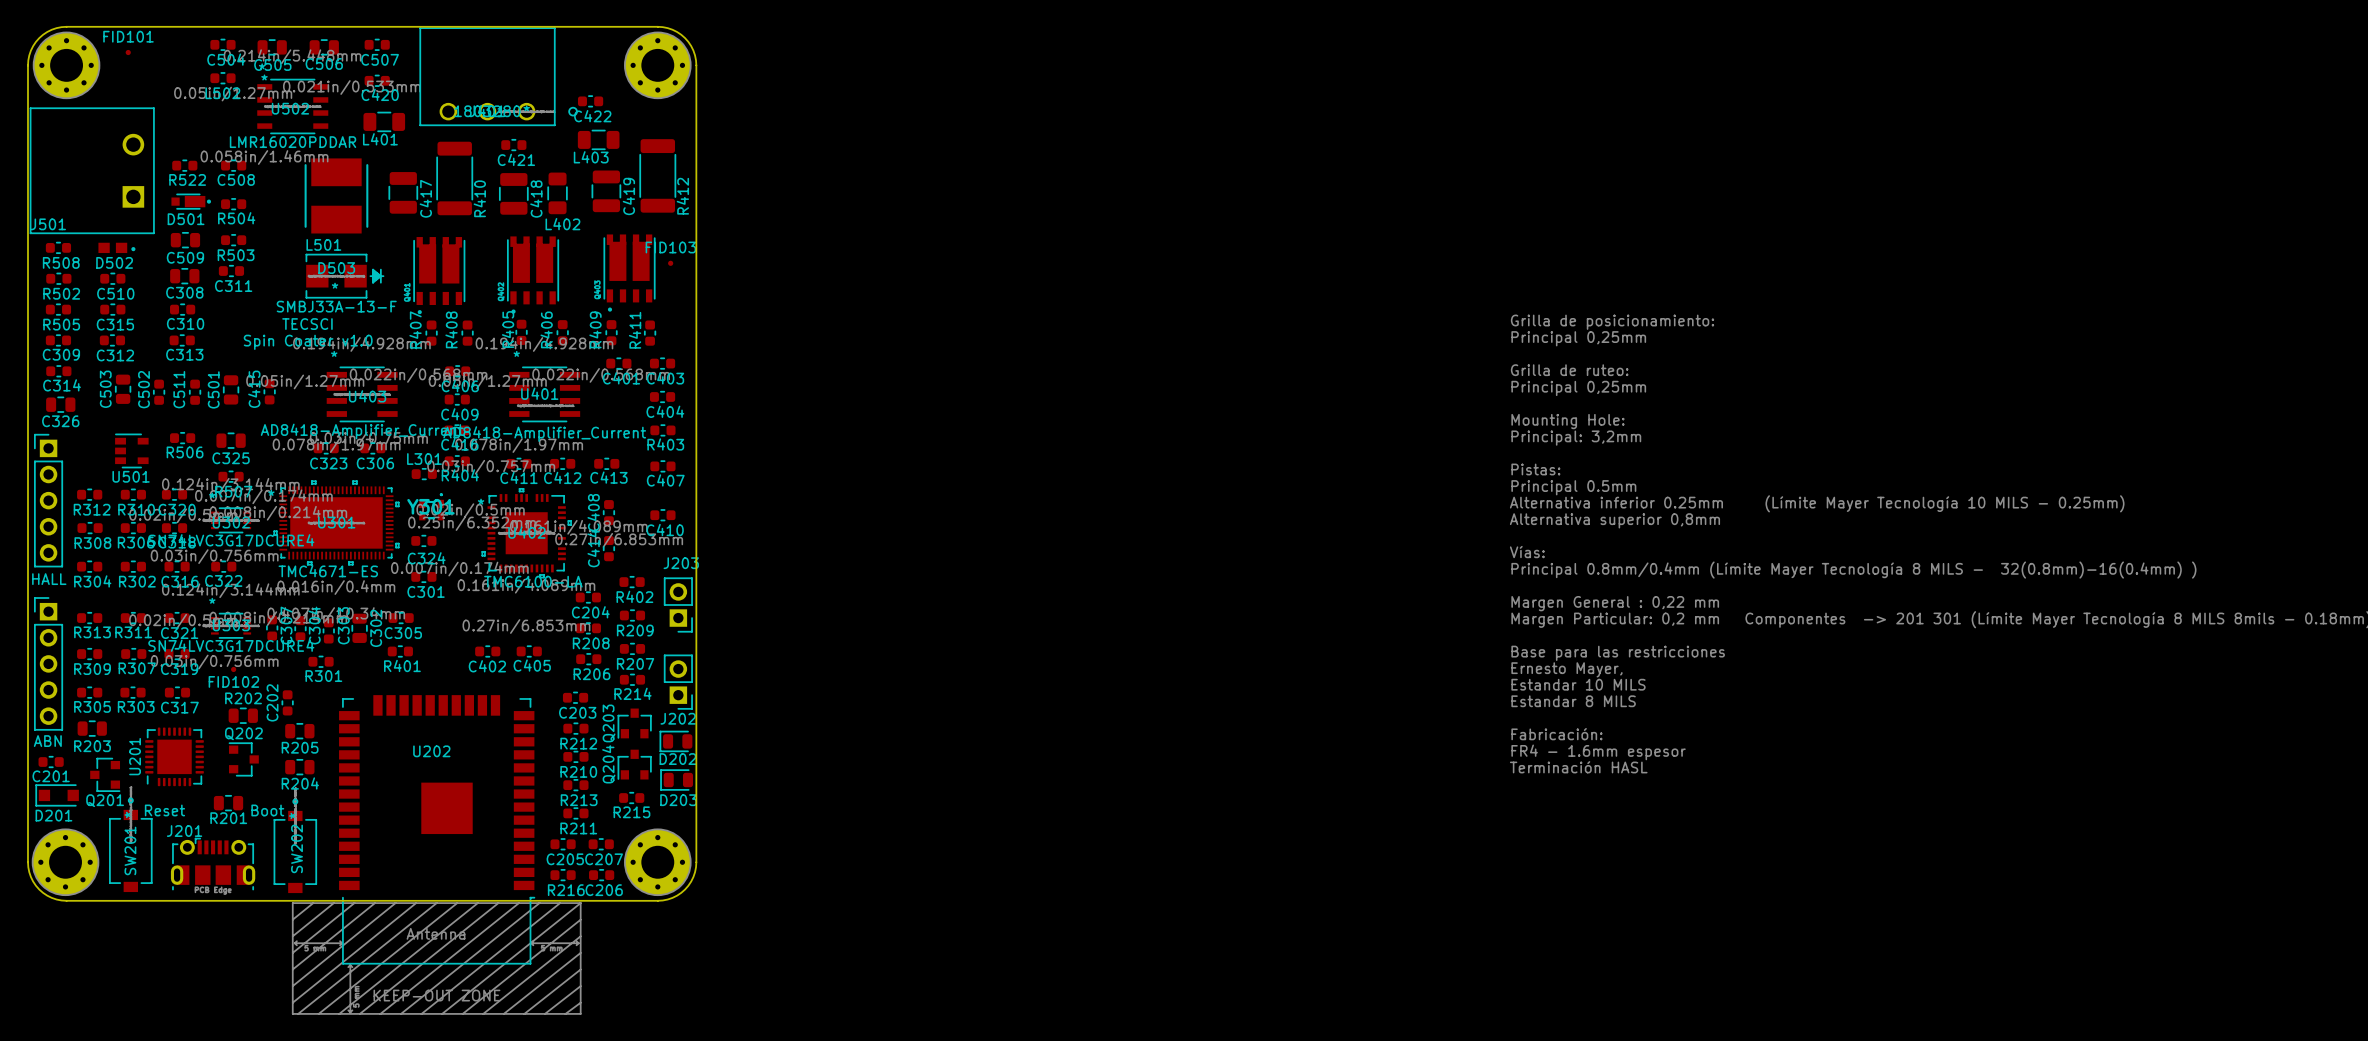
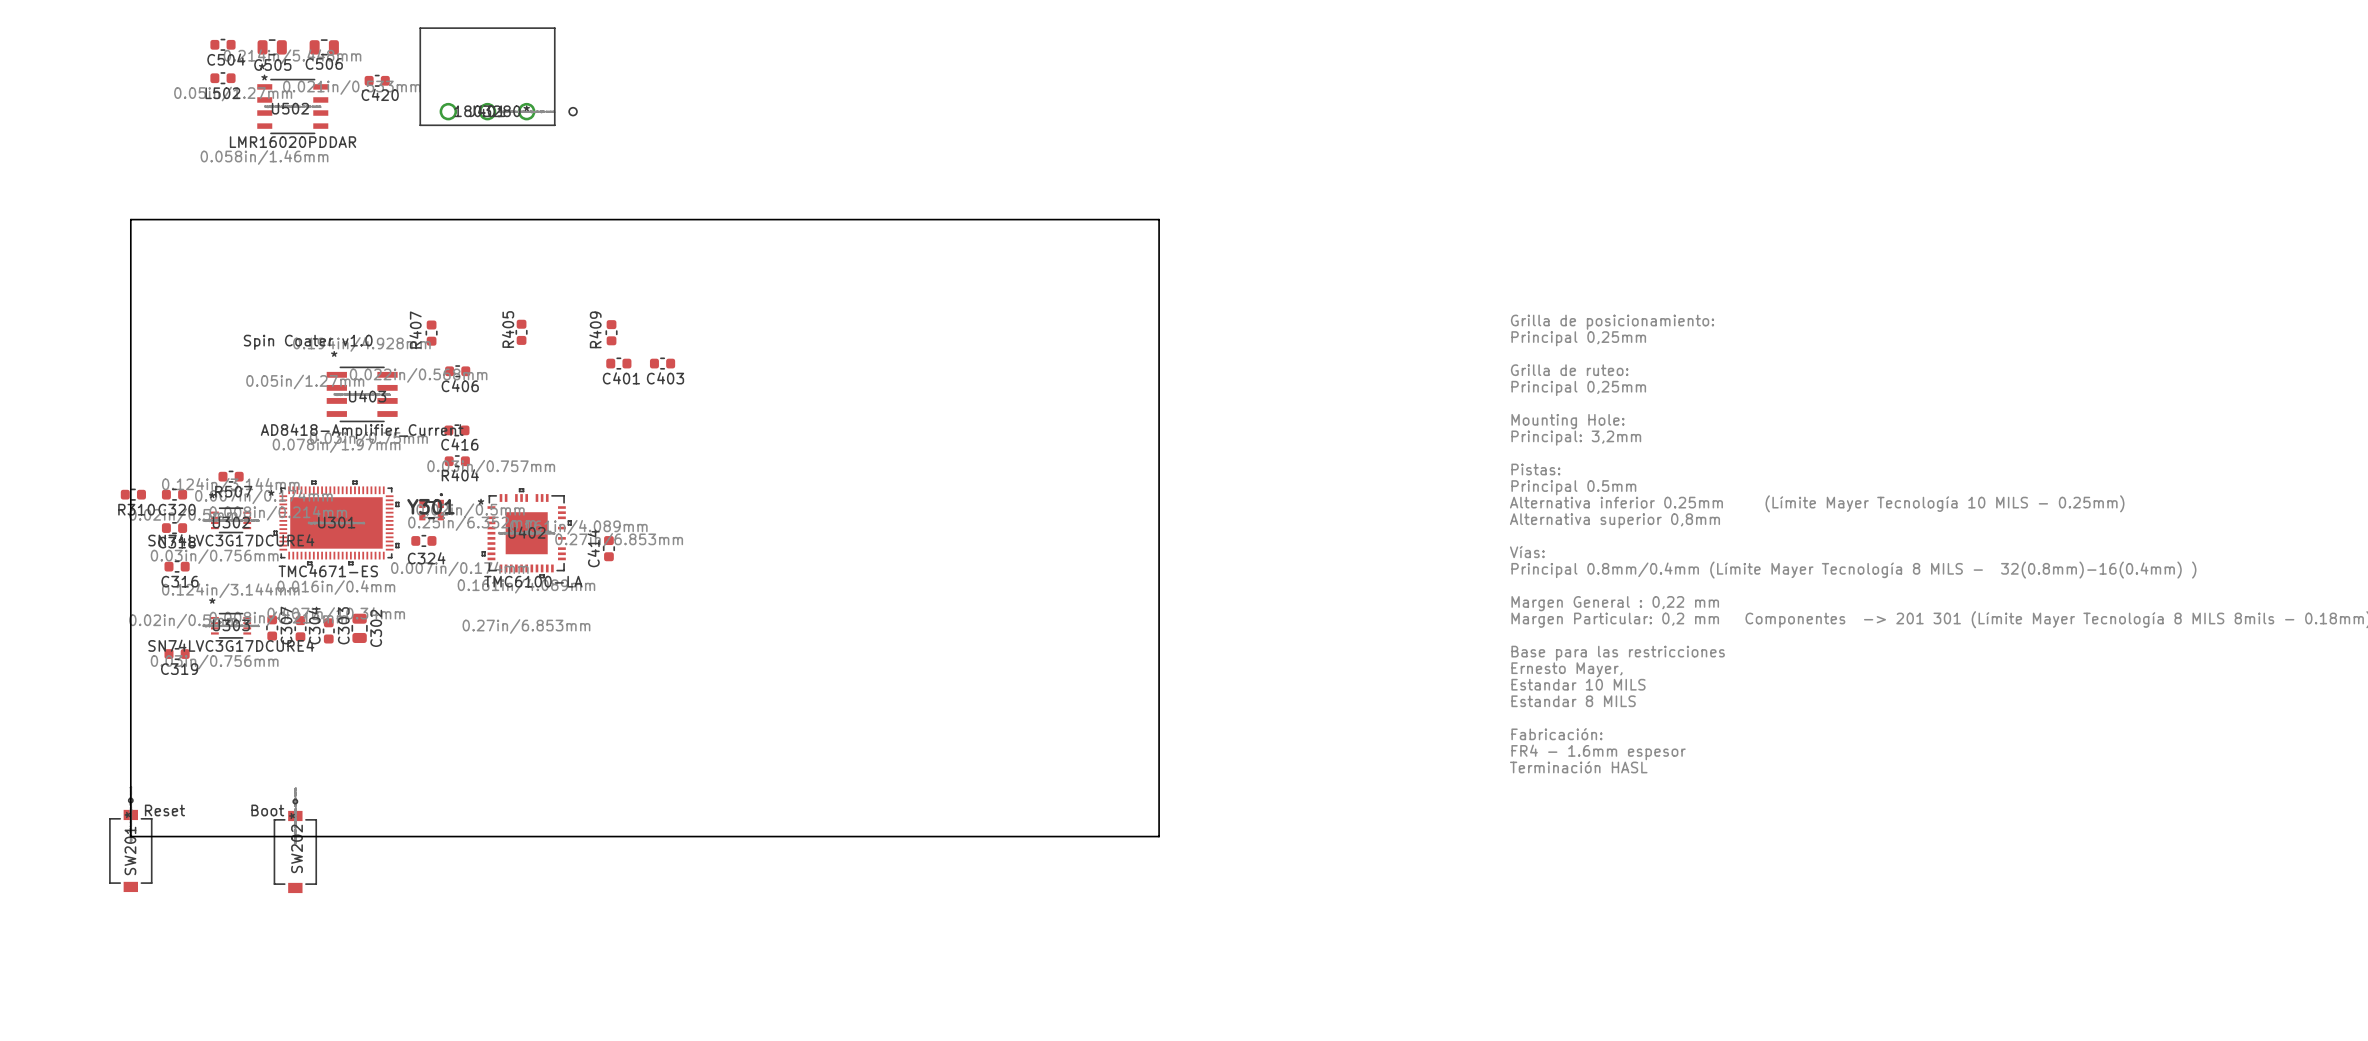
board edge: (66, 26) (657, 26) (677, 31) (688, 41) (693, 50) (696, 65) (696, 862) (693, 877) (681, 892) (672, 897) (657, 900) (66, 900) (51, 897) (35, 885) (29, 872) (27, 862) (27, 65) (30, 50) (39, 38) (51, 29) (66, 26) -> none
C507: (377, 44) -> none
FID101: (128, 52) -> none
part: (66, 65) -> none
part: (657, 65) -> none
C422: (590, 101) -> none
L401: (384, 121) -> none
L403: (598, 139) -> none
C421: (513, 145) -> none
R522: (184, 165) -> none
C508: (233, 165) -> none
R412: (657, 175) -> none
R410: (454, 178) -> none
J501: (92, 179) -> none
C419: (606, 191) -> none
C417: (403, 192) -> none
C418: (513, 193) -> none
L402: (557, 193) -> none
L501: (336, 195) -> none
D501: (191, 201) -> none
R504: (233, 204) -> none
board edge: none -> (130, 219) (1159, 219) (1159, 836) (130, 836) (130, 219)
C509: (185, 240) -> none
R503: (233, 240) -> none
R508: (58, 247) -> none
D502: (112, 247) -> none
FID103: (670, 263) -> none
C311: (231, 271) -> none
part: (629, 273) -> none
part: (439, 275) -> none
part: (533, 275) -> none
C308: (184, 276) -> none
D503: SMBJ33A-13-F (344, 276) -> none
R502: (58, 278) -> none
C510: (112, 278) -> none
R505: (58, 309) -> none
C315: (112, 309) -> none
C310: (182, 309) -> none
text: TECSCI (307, 324) -> none
R406: (562, 332) -> none
R408: (467, 333) -> none
R411: (650, 333) -> none
C309: (58, 340) -> none
C312: (112, 340) -> none
C313: (182, 340) -> none
C314: (58, 371) -> none
C503: (123, 389) -> none
C501: (231, 389) -> none
C415: (269, 391) -> none
C502: (159, 392) -> none
C511: (195, 392) -> none
U401: AD8418-Amplifier_Current (544, 394) -> none
C404: (662, 396) -> none
C409: (457, 399) -> none
C326: (60, 404) -> none
R403: (662, 430) -> none
R506: (182, 438) -> none
C325: (231, 440) -> none
C323: (326, 448) -> none
C306: (372, 448) -> none
U501: (131, 450) -> none
C411: (518, 463) -> none
C412: (562, 463) -> none
C413: (606, 463) -> none
C407: (662, 466) -> none
L301: (424, 474) -> none
R312: (89, 494) -> none
part: (48, 500) -> none
C408: (608, 512) -> none
C410: (662, 515) -> none
R308: (90, 528) -> none
R306: (133, 528) -> none
R304: (89, 566) -> none
R302: (133, 566) -> none
C322: (223, 566) -> none
C301: (423, 576) -> none
text: HALL (49, 579) -> none
R402: (632, 582) -> none
C204: (588, 597) -> none
J203: (678, 604) -> none
R209: (632, 615) -> none
R313: (89, 618) -> none
R311: (133, 618) -> none
C321: (177, 618) -> none
C305: (401, 618) -> none
R208: (588, 628) -> none
R207: (632, 648) -> none
R401: (400, 651) -> none
C402: (487, 651) -> none
C405: (529, 651) -> none
R309: (89, 654) -> none
R307: (133, 654) -> none
R206: (588, 659) -> none
R301: (321, 661) -> none
part: (48, 663) -> none
FID102: (233, 669) -> none
R214: (632, 679) -> none
J202: (678, 682) -> none
R305: (89, 692) -> none
R303: (133, 692) -> none
C317: (177, 692) -> none
C203: (575, 697) -> none
C202: (287, 702) -> none
R202: (243, 715) -> none
Q203: (634, 723) -> none
R203: (92, 728) -> none
R212: (575, 728) -> none
R205: (299, 731) -> none
text: ABN (47, 741) -> none
D202: (676, 741) -> none
U201: (174, 756) -> none
R210: (575, 756) -> none
Q202: (243, 759) -> none
C201: (51, 762) -> none
Q204: (634, 764) -> none
R204: (299, 767) -> none
Q201: (105, 774) -> none
D203: (676, 780) -> none
R213: (575, 785) -> none
D201: (57, 795) -> none
R215: (631, 798) -> none
R201: (228, 803) -> none
R211: (575, 813) -> none
C205: (563, 844) -> none
C207: (601, 844) -> none
U202: (436, 854) -> none
part: (65, 862) -> none
part: (657, 862) -> none
J201: (213, 864) -> none
R216: (563, 875) -> none
C206: (601, 875) -> none

